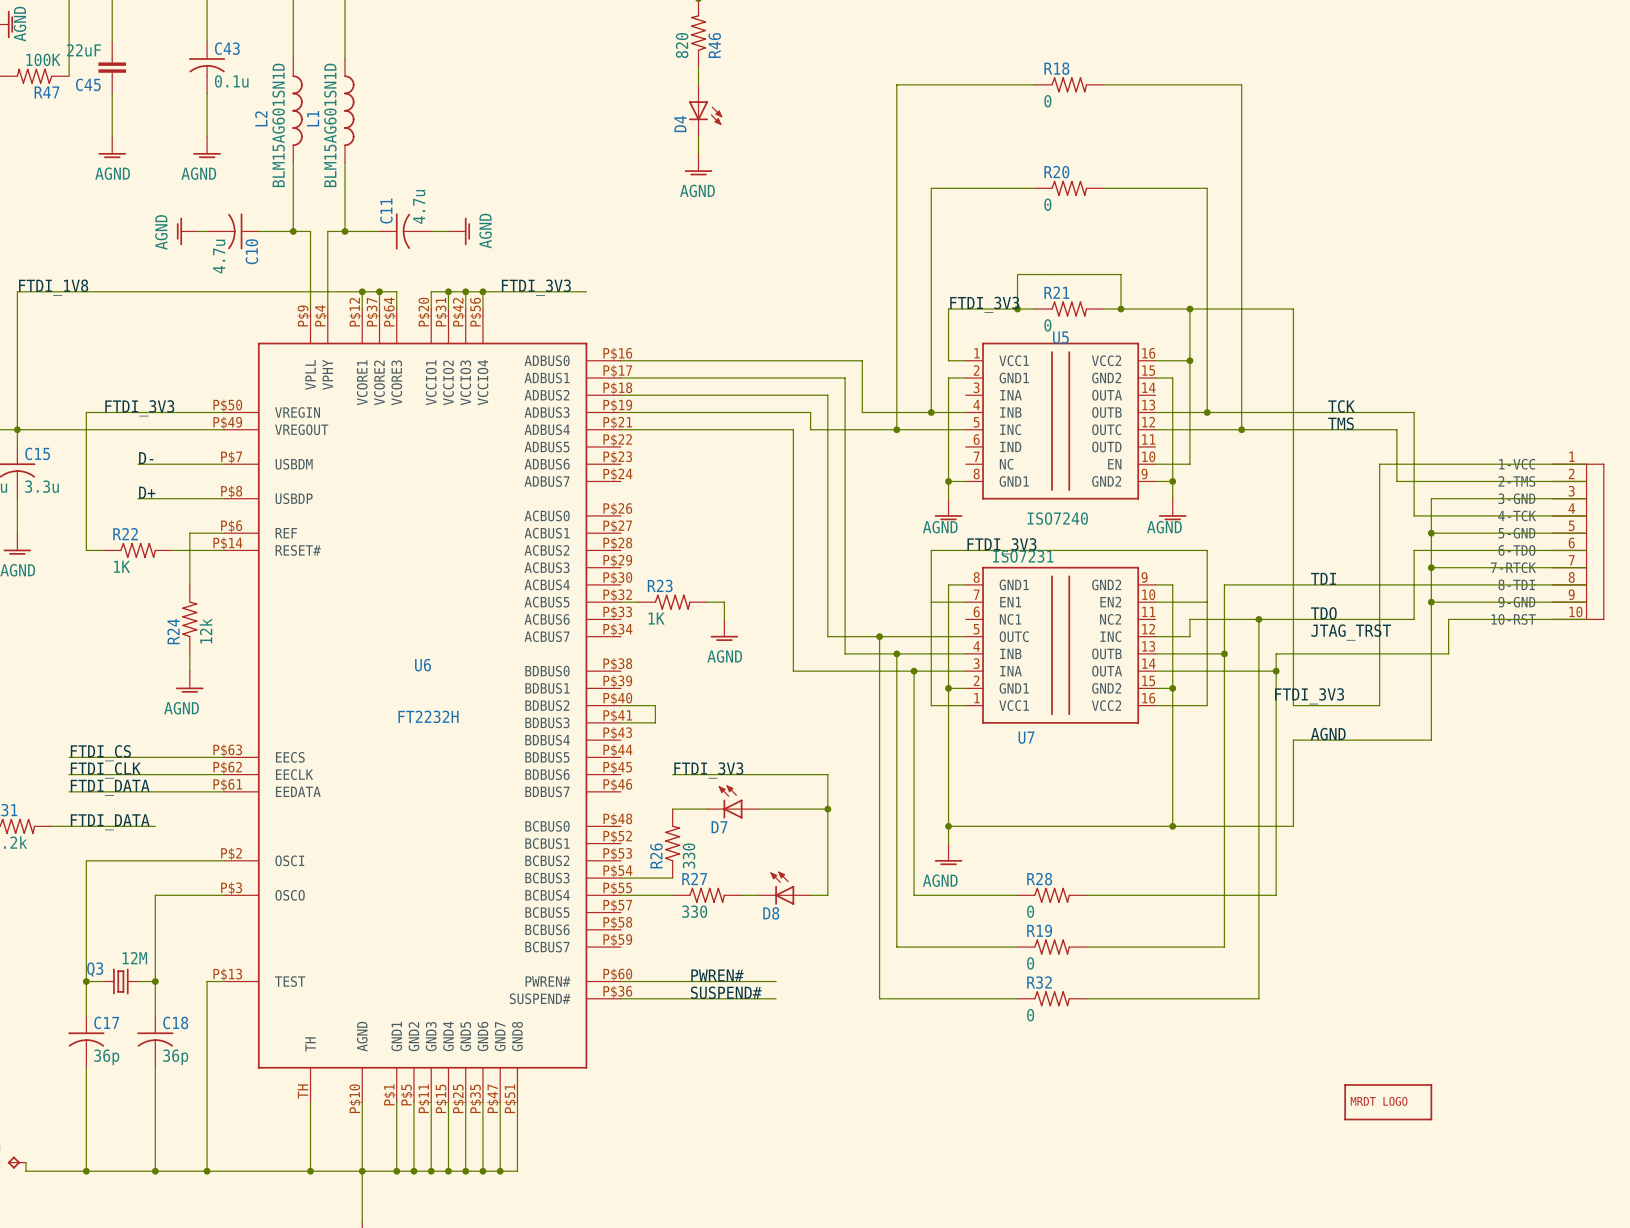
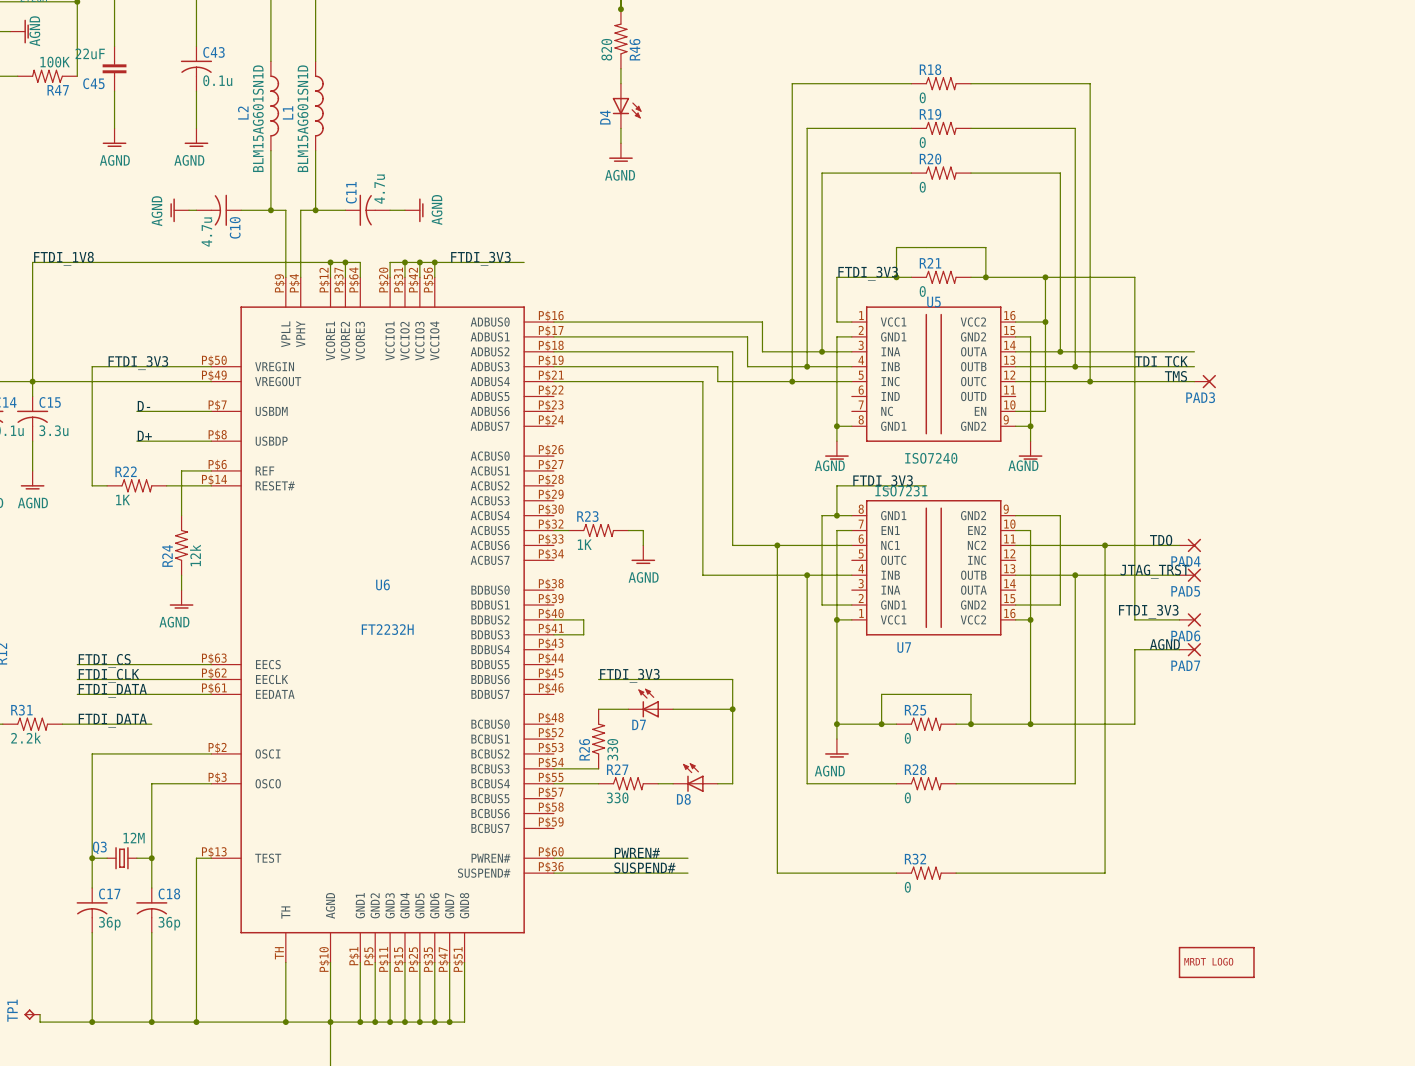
wire: none -> (911, 128) (807, 128) (807, 366)
wire: none -> (970, 128) (1075, 128) (1075, 366)
wire: (862, 395) (862, 412) -> (747, 366) (762, 366)
wire: none -> (762, 351) (851, 351)
wire: (931, 395) (931, 412) -> none
junction: none -> (822, 351)
wire: none -> (1015, 351) (1194, 351)
wire: (1207, 395) (1207, 412) -> none
junction: none -> (1060, 351)
label: none -> TDI (1145, 361)
wire: (845, 412) (845, 653) -> none
junction: none -> (807, 366)
junction: (931, 412) -> none
junction: (1207, 412) -> none
junction: none -> (1075, 366)
wire: (1362, 412) (1414, 412) (1414, 515) (1586, 515) -> none
wire: (1362, 429) (1396, 429) (1396, 481) (1586, 481) -> none
PAD3: none -> (1205, 381)
wire: (1586, 464) (1379, 464) (1379, 705) (1345, 705) -> none
wire: (1586, 498) (1431, 498) (1431, 740) (1345, 740) -> none
wire: (1431, 533) (1586, 533) -> none
junction: (1431, 533) -> none
part: (1578, 541) -> none
wire: (948, 550) (931, 550) (931, 584) -> (836, 485) (836, 515) (822, 515)
wire: (1052, 550) (1207, 550) (1207, 584) -> none
wire: (1586, 550) (1414, 550) (1414, 619) (1345, 619) -> none
wire: (1431, 567) (1586, 567) -> none
junction: (1431, 567) -> none
label: TDI (1323, 578) -> none
wire: (948, 584) (948, 602) (931, 602) -> none
junction: none -> (836, 515)
wire: (1172, 584) (1172, 602) (1207, 602) -> (1030, 515) (1060, 515)
wire: (1586, 584) (1224, 584) (1224, 653) -> (1119, 575) (1075, 575)
wire: (1431, 602) (1586, 602) -> none
junction: (1431, 602) -> none
wire: (827, 619) (827, 636) (965, 636) -> (732, 545) (851, 545)
wire: none -> (777, 545) (777, 560)
wire: (1189, 619) (1189, 636) (1155, 636) -> (1045, 545) (1015, 545)
PAD4: none -> (1190, 545)
wire: (1586, 619) (1448, 619) (1448, 653) (1345, 653) -> none
label position: JTAG_TRST (1351, 632) -> JTAG_TRST (1155, 571)
junction position: (879, 636) -> (777, 545)
wire: (793, 653) (793, 671) (965, 671) -> (702, 575) (747, 575)
wire: (896, 653) (896, 947) (1017, 947) -> none
junction: (896, 653) -> none
wire: none -> (807, 575) (807, 590)
junction: none -> (807, 575)
wire: (1276, 653) (1276, 895) (1224, 895) (1224, 947) (1086, 947) -> none
PAD5: none -> (1190, 575)
junction: (914, 671) -> none
wire: (1155, 671) (1276, 671) -> none
junction: (1276, 671) -> none
wire: (931, 688) (931, 705) (948, 705) -> (822, 605) (836, 605)
junction position: (948, 688) -> (836, 619)
junction position: (1172, 688) -> (1030, 619)
wire: (1207, 688) (1207, 705) (1172, 705) -> (1060, 605) (1030, 605)
PAD6: none -> (1190, 619)
PAD7: none -> (1190, 649)
wire: none -> (881, 724) (881, 694) (970, 694) (970, 724)
junction: none -> (881, 724)
R25: none -> 0 (926, 724)
junction: none -> (970, 724)
R19 position: (1052, 947) -> (941, 128)

